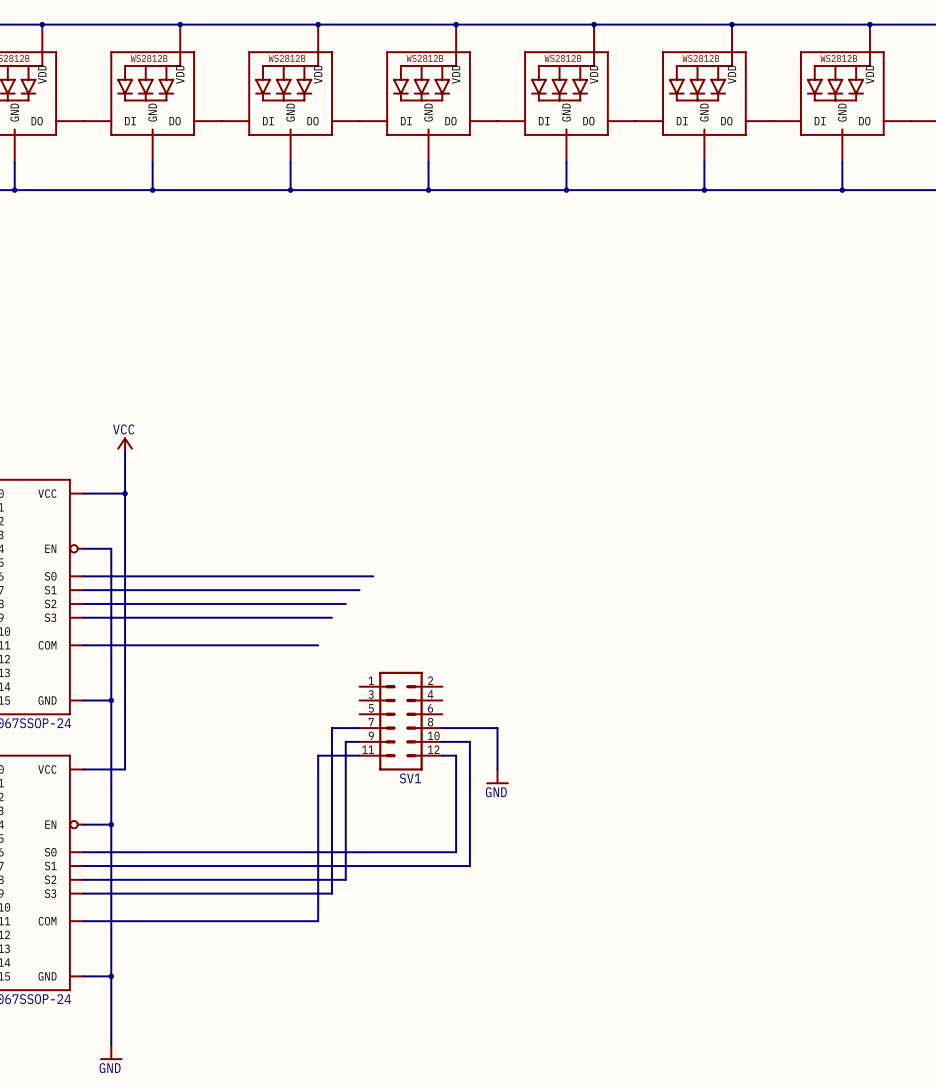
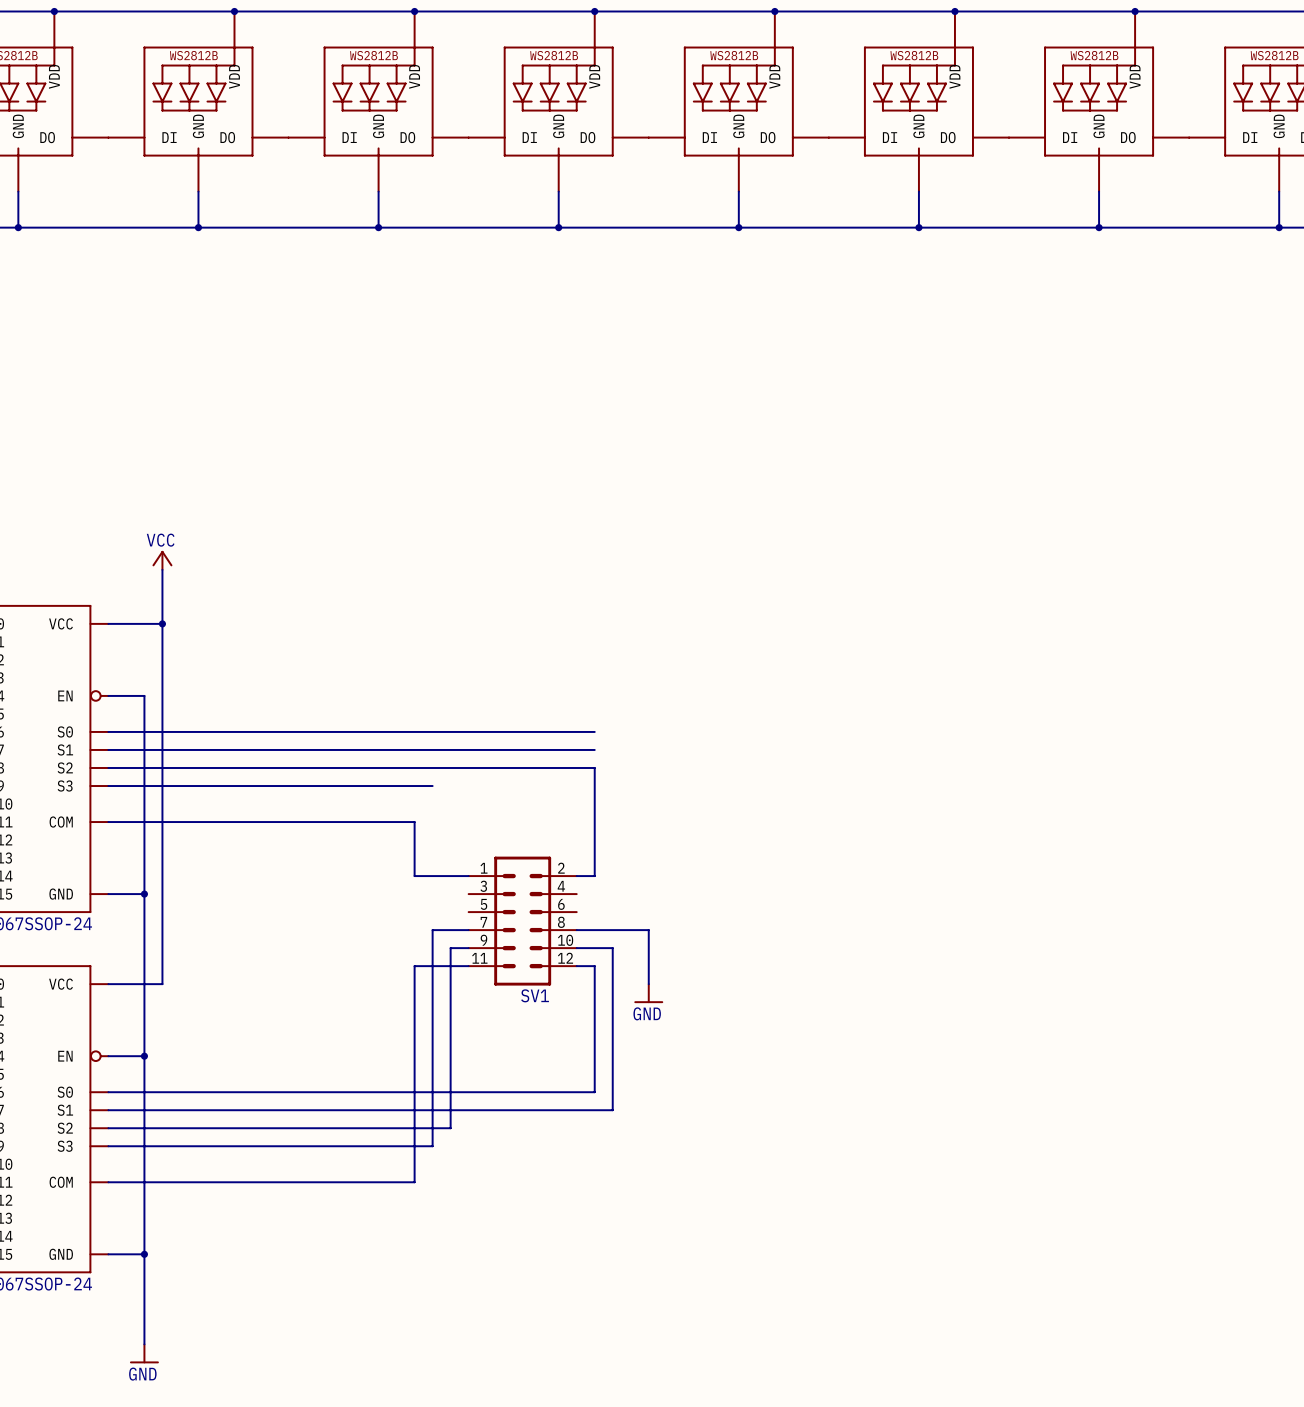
wire: none -> (486, 731) (594, 731)
wire: none -> (468, 749) (594, 749)
wire: none -> (450, 767) (594, 767) (594, 876) (576, 876)
wire: none -> (414, 822) (414, 876) (468, 876)

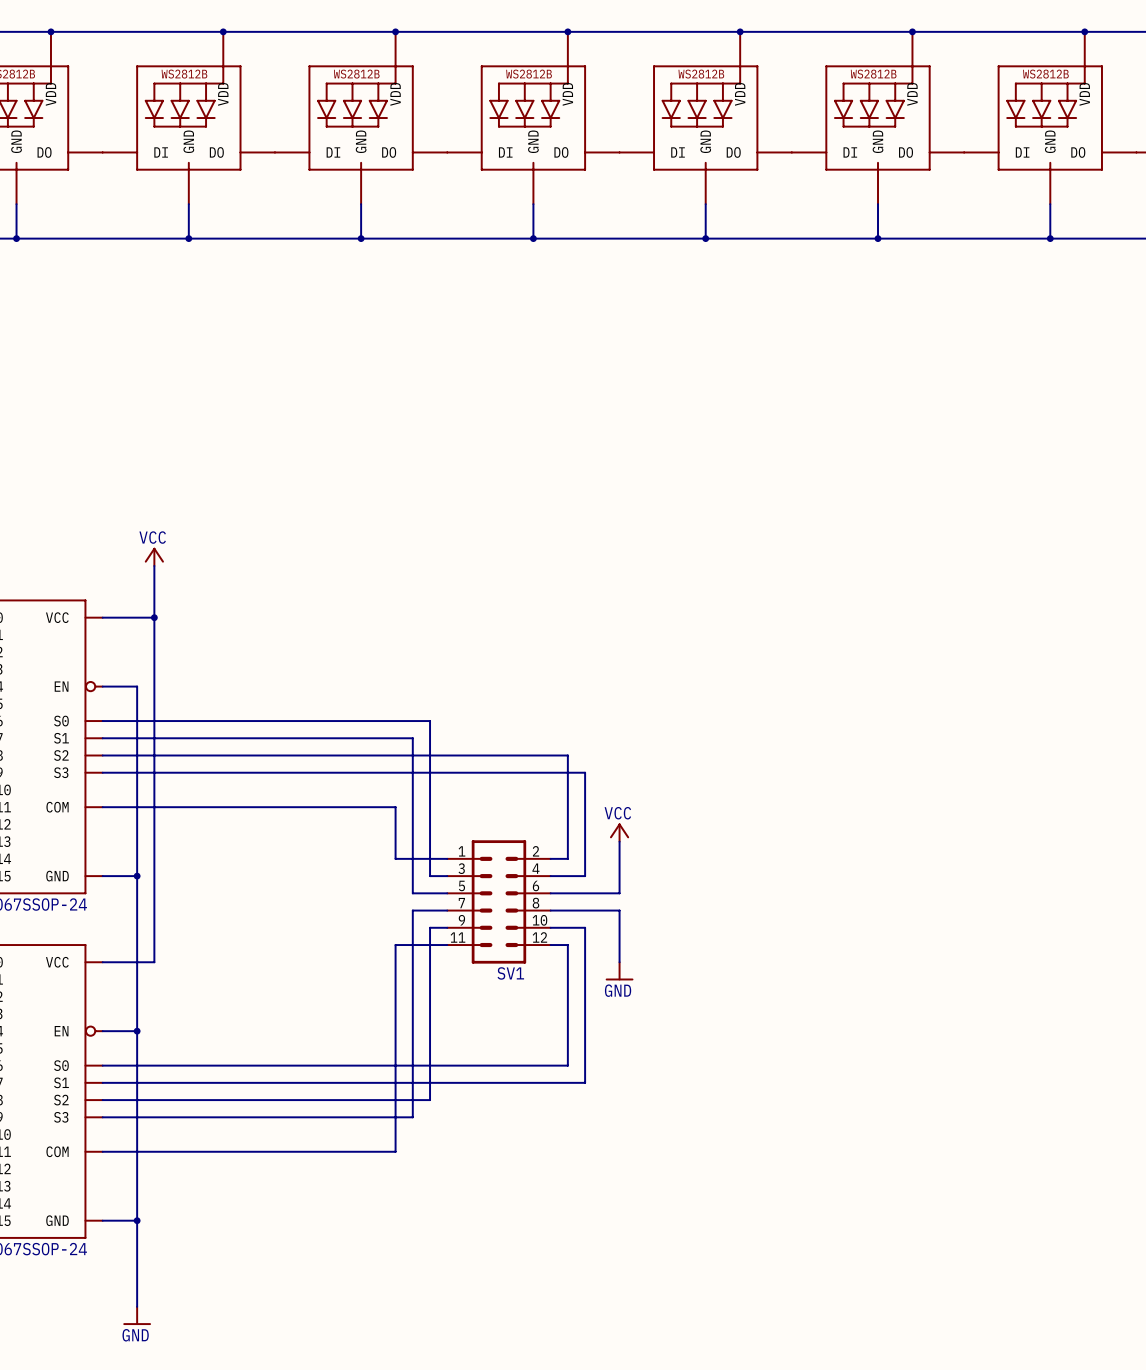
wire: (450, 731) (594, 731) -> (430, 721) (430, 876) (447, 876)
wire: (432, 749) (594, 749) -> (412, 738) (412, 893) (447, 893)
wire: none -> (412, 772) (585, 772) (585, 876) (550, 876)
power symbol: none -> VCC (619, 832)
wire: none -> (619, 841) (619, 893) (550, 893)

